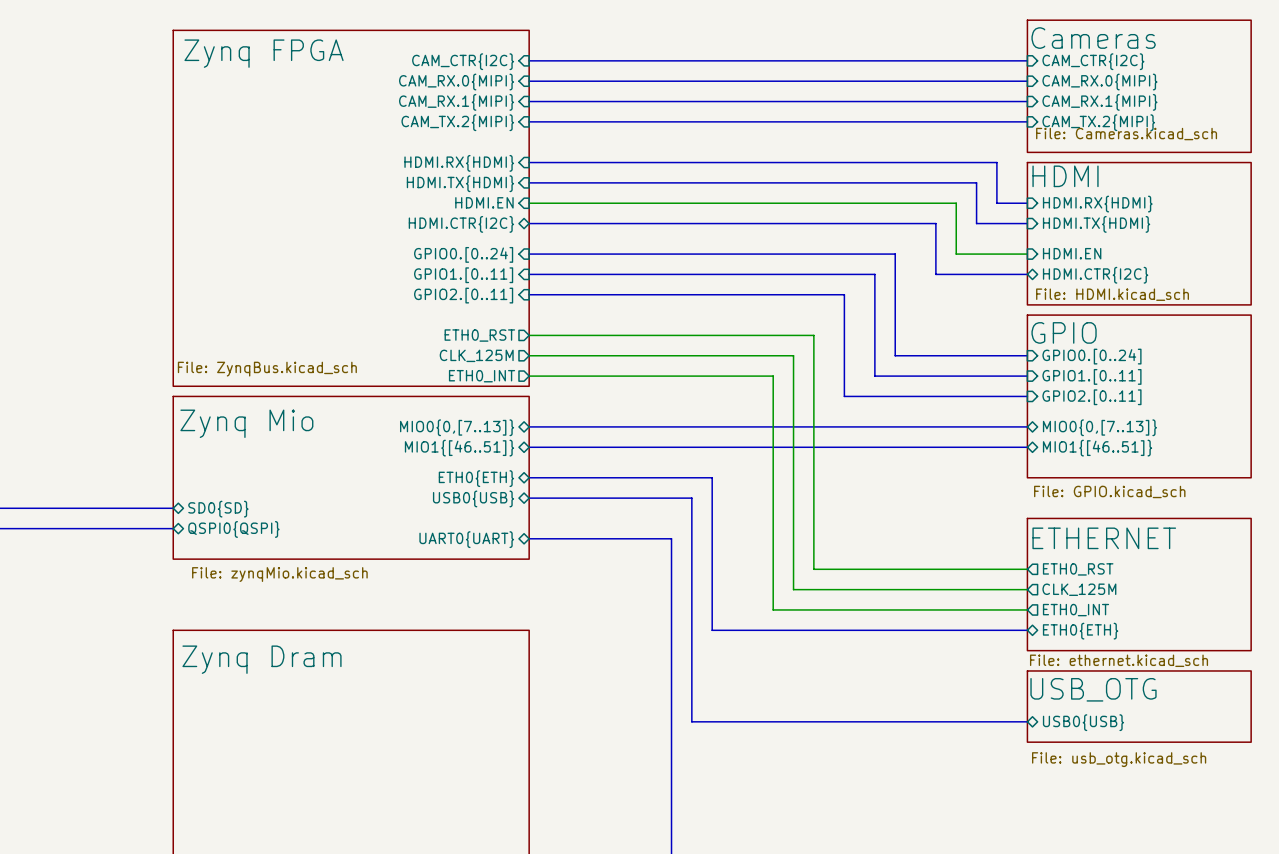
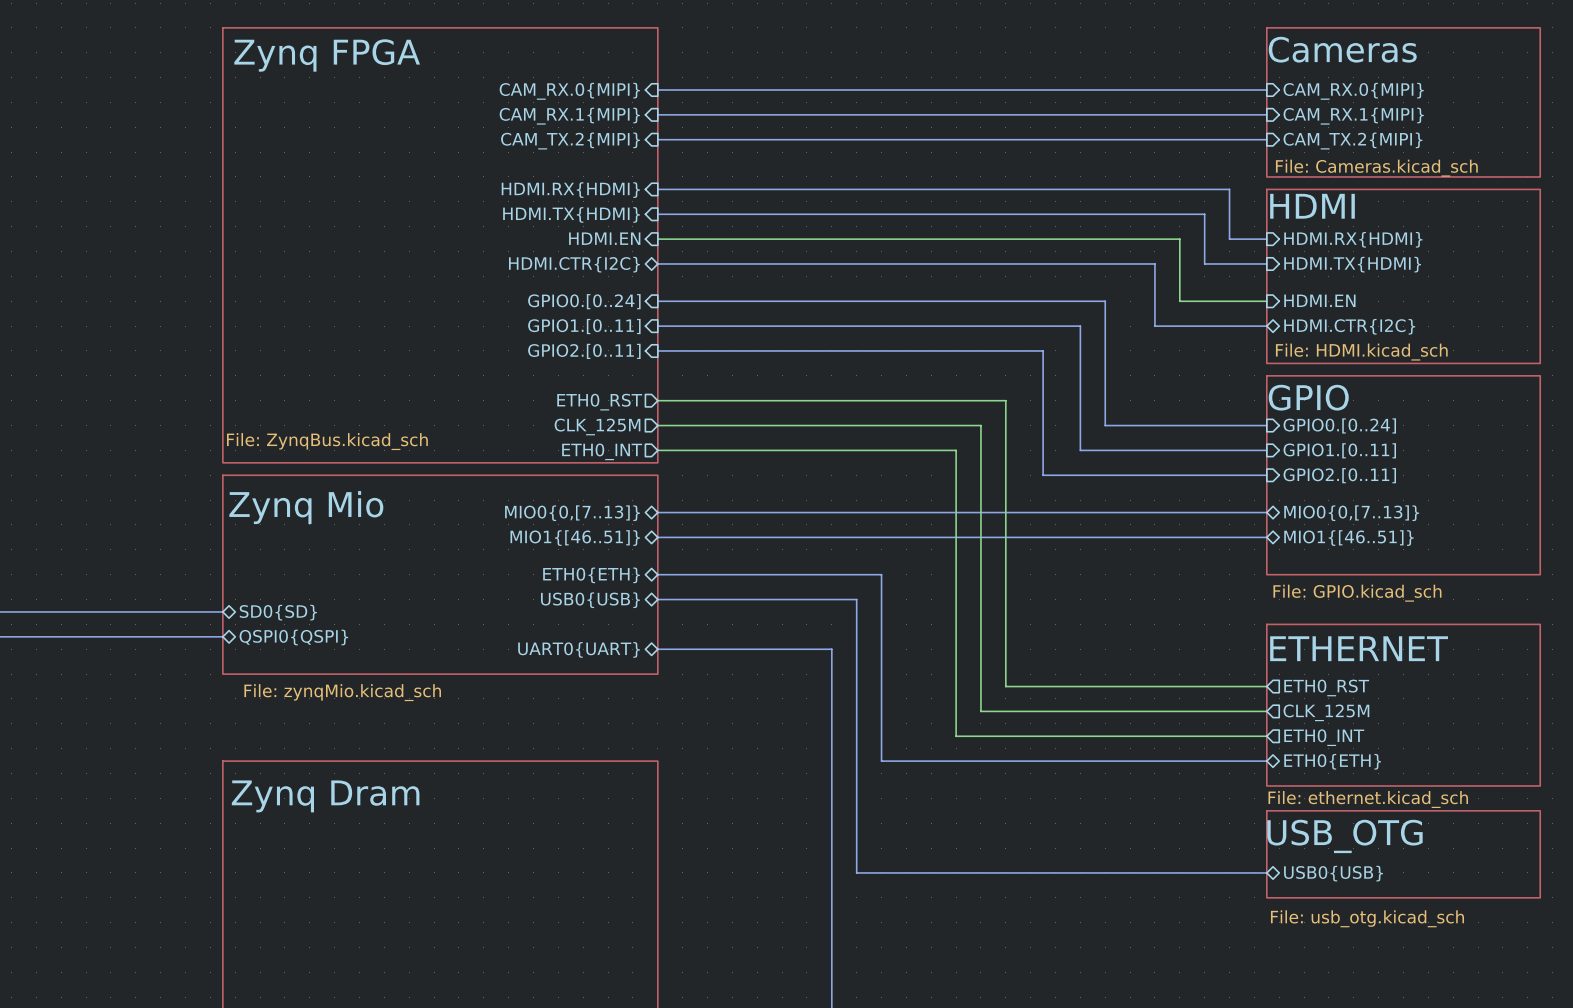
sheet Cameras shape: [1026, 19, 1252, 153] -> [1266, 27, 1541, 178]
bus: (529, 60) (1027, 60) -> none
sheet pin: CAM_CTR{I2C} (463, 61) -> none
sheet pin: CAM_CTR{I2C} (1093, 61) -> none

